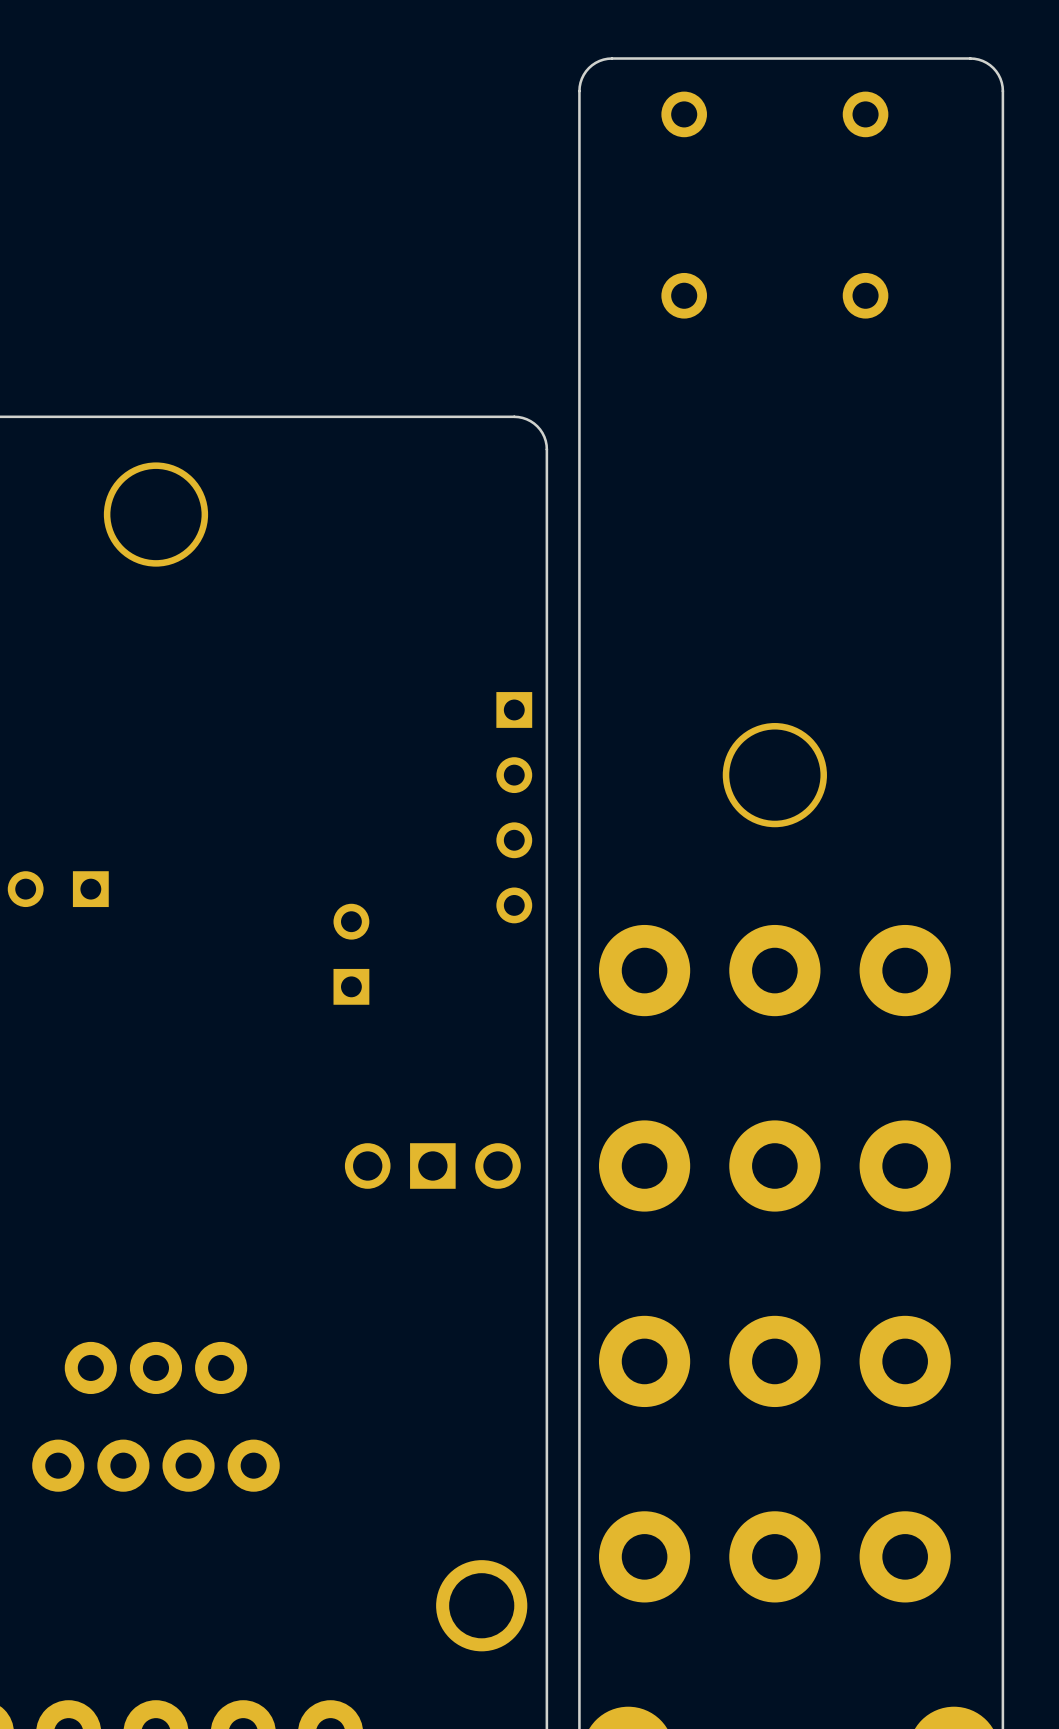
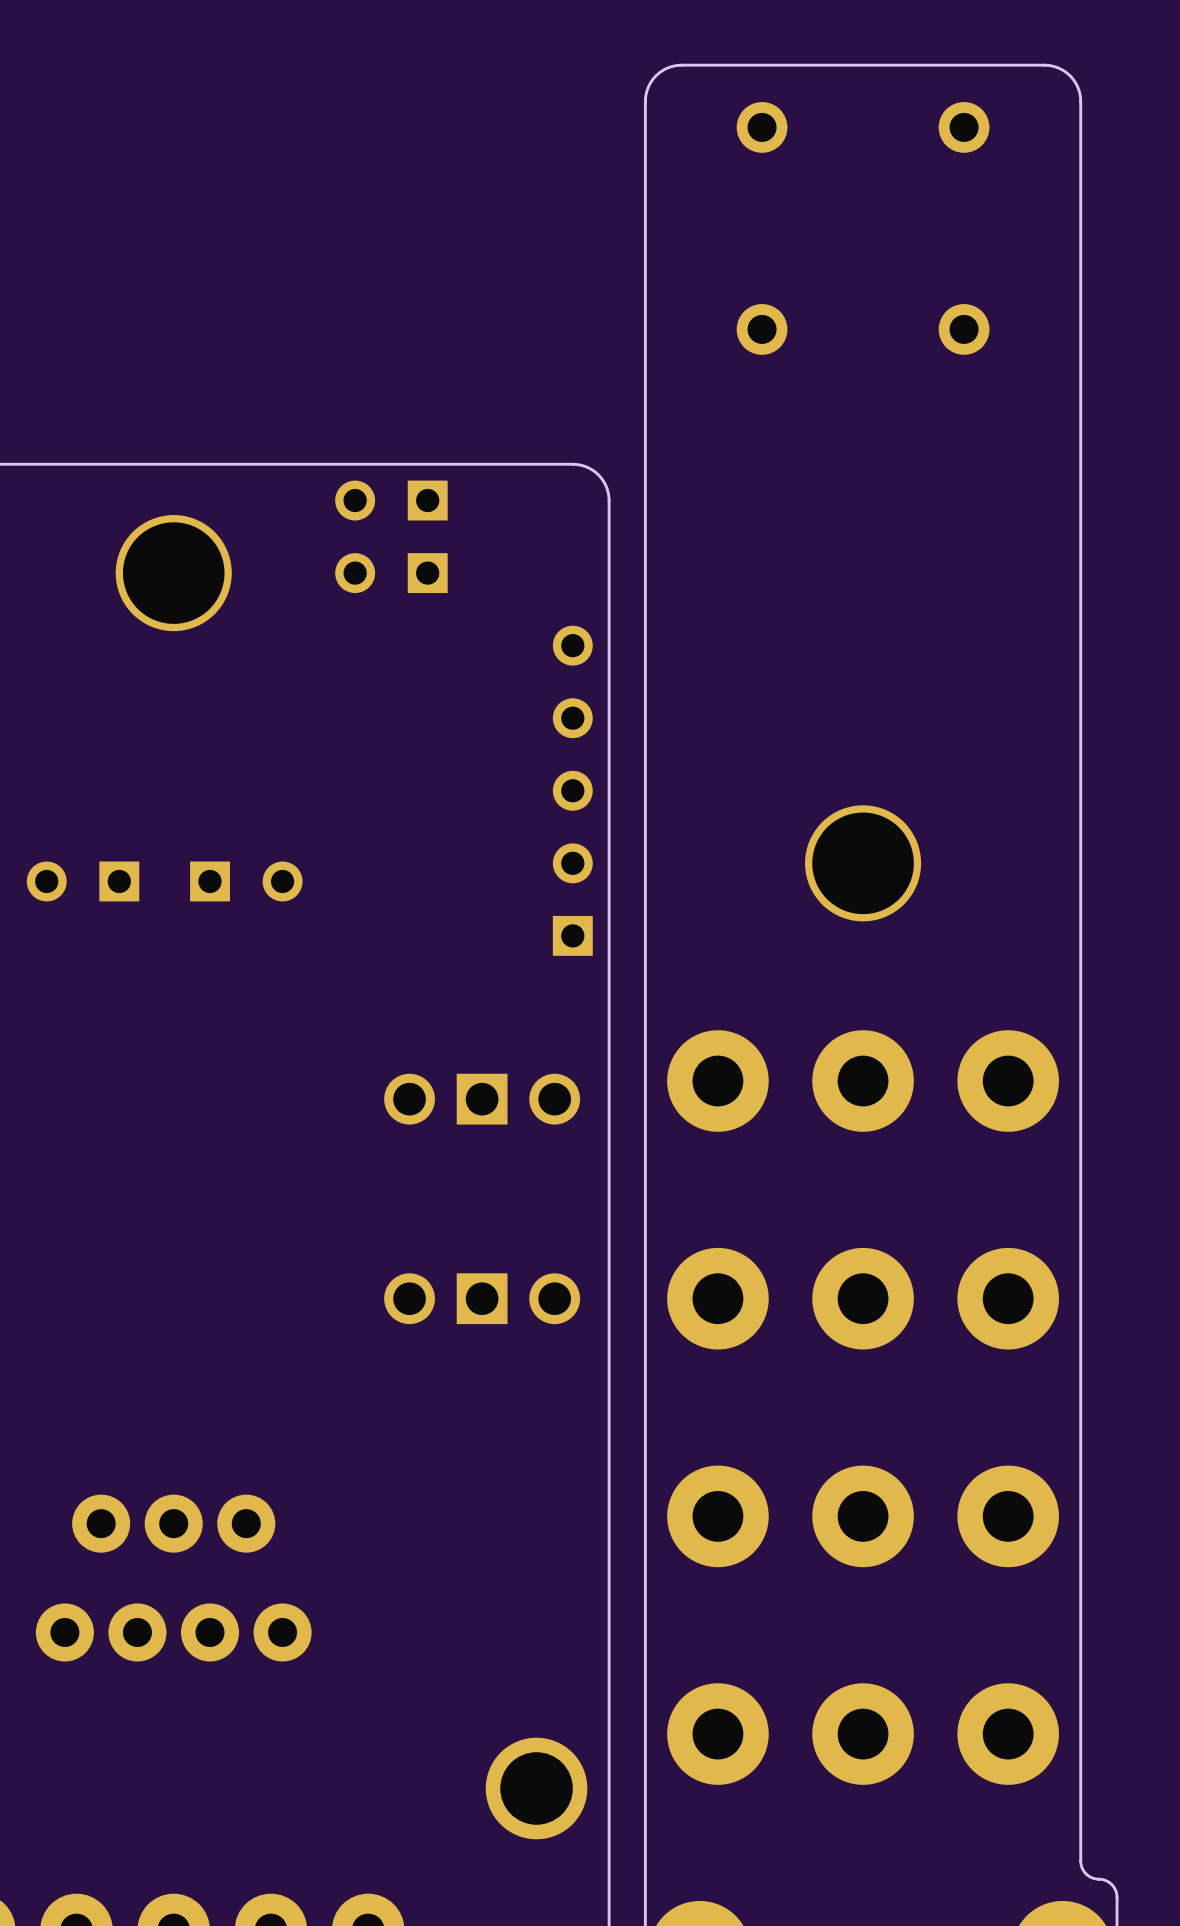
board edge: (937, 58) (974, 58) (986, 62) (998, 74) (1002, 91) (1002, 1703) -> (1044, 65) (1058, 67) (1070, 75) (1077, 87) (1080, 101) (1080, 1861) (1083, 1870) (1087, 1875) (1105, 1880) (1111, 1884) (1117, 1897)
part: none -> (391, 500)
part: none -> (391, 573)
part: none -> (572, 790)
part: none -> (83, 881)
part: none -> (246, 881)
part: (514, 807) -> none
part: (58, 889) -> none
part: (351, 954) -> none
part: none -> (482, 1099)

